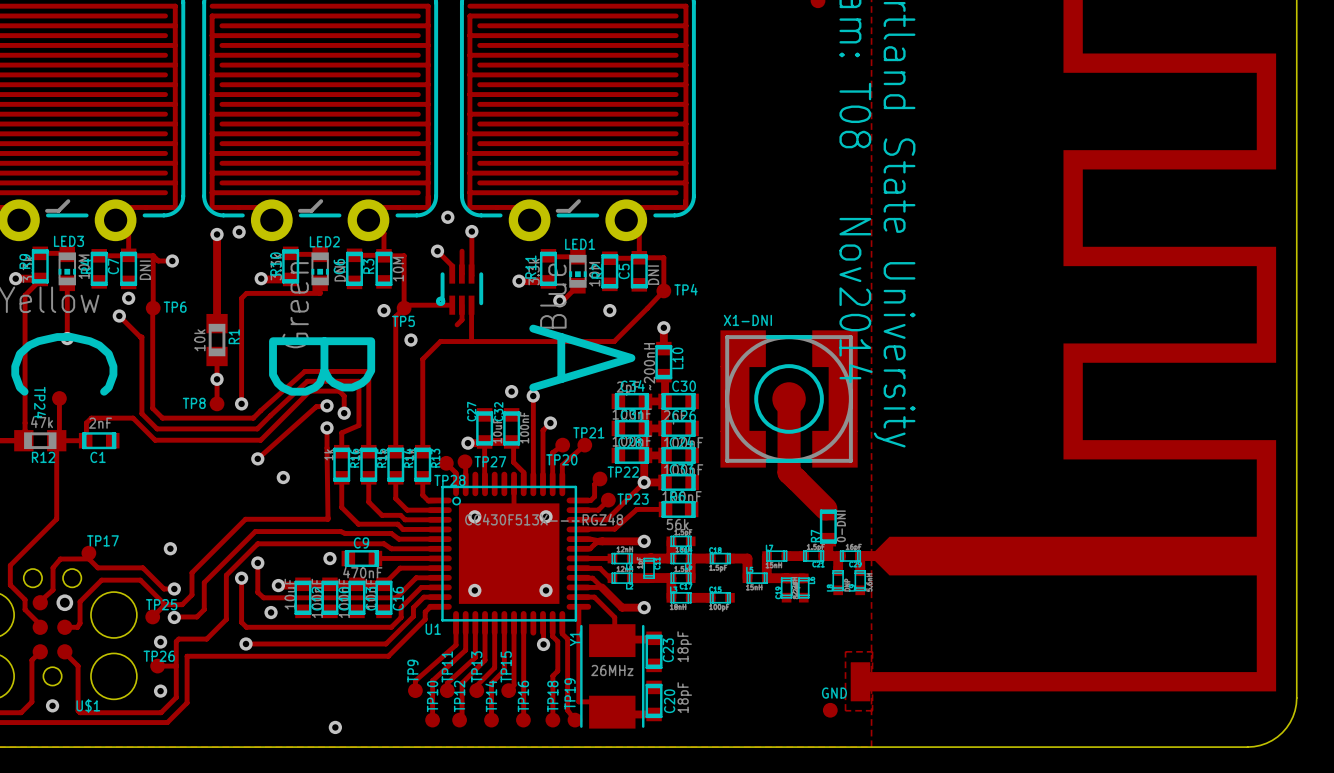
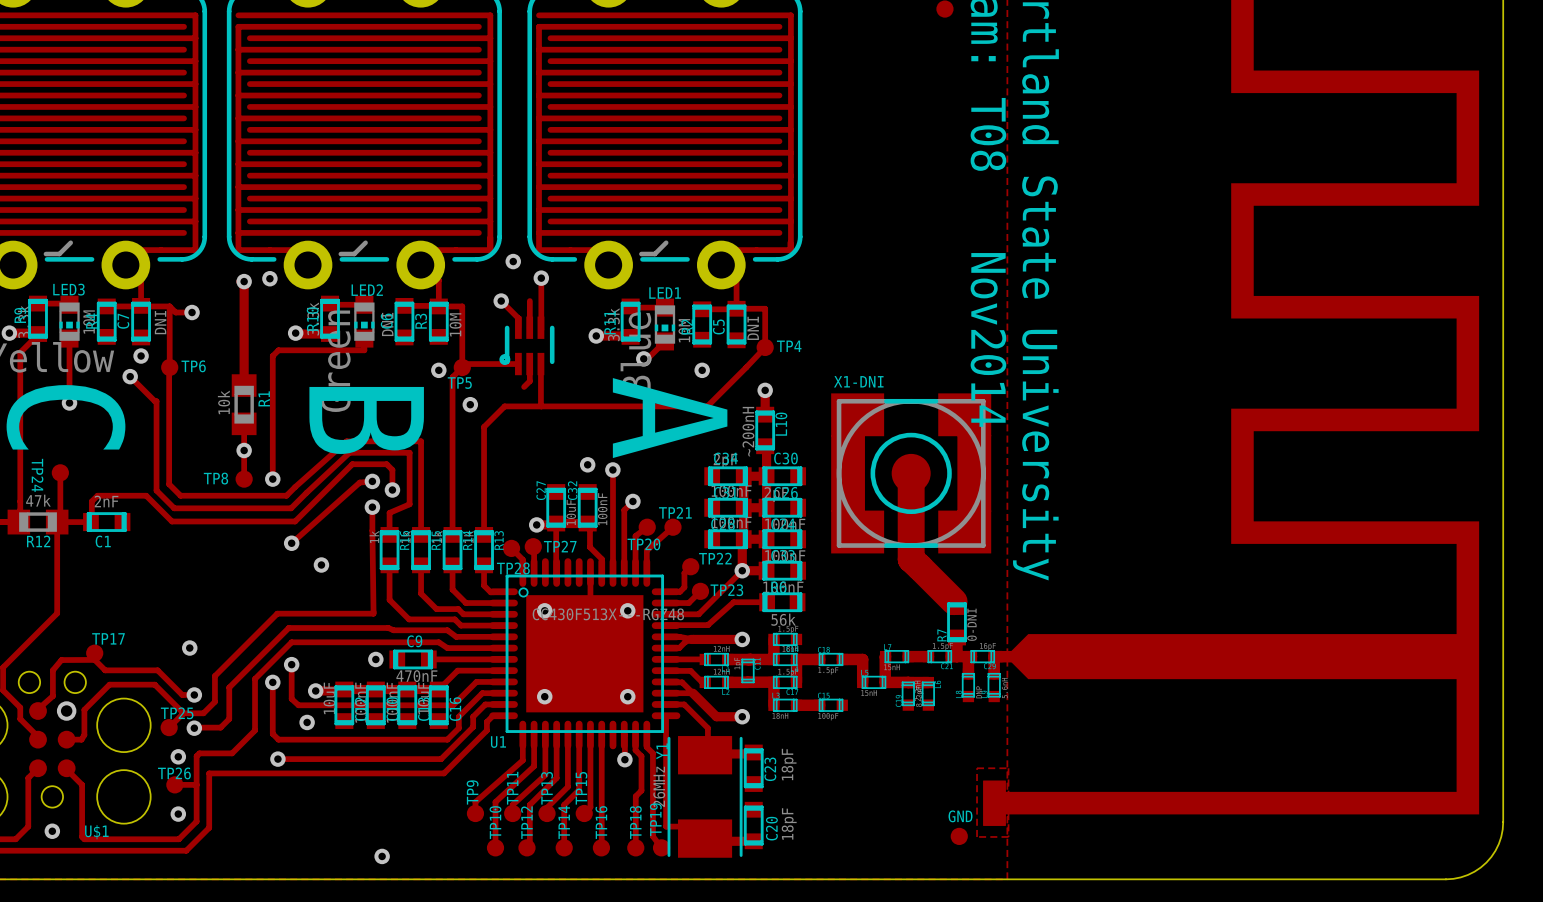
Y1 value rotation: 0° (612, 670) -> 90° counterclockwise (659, 786)

